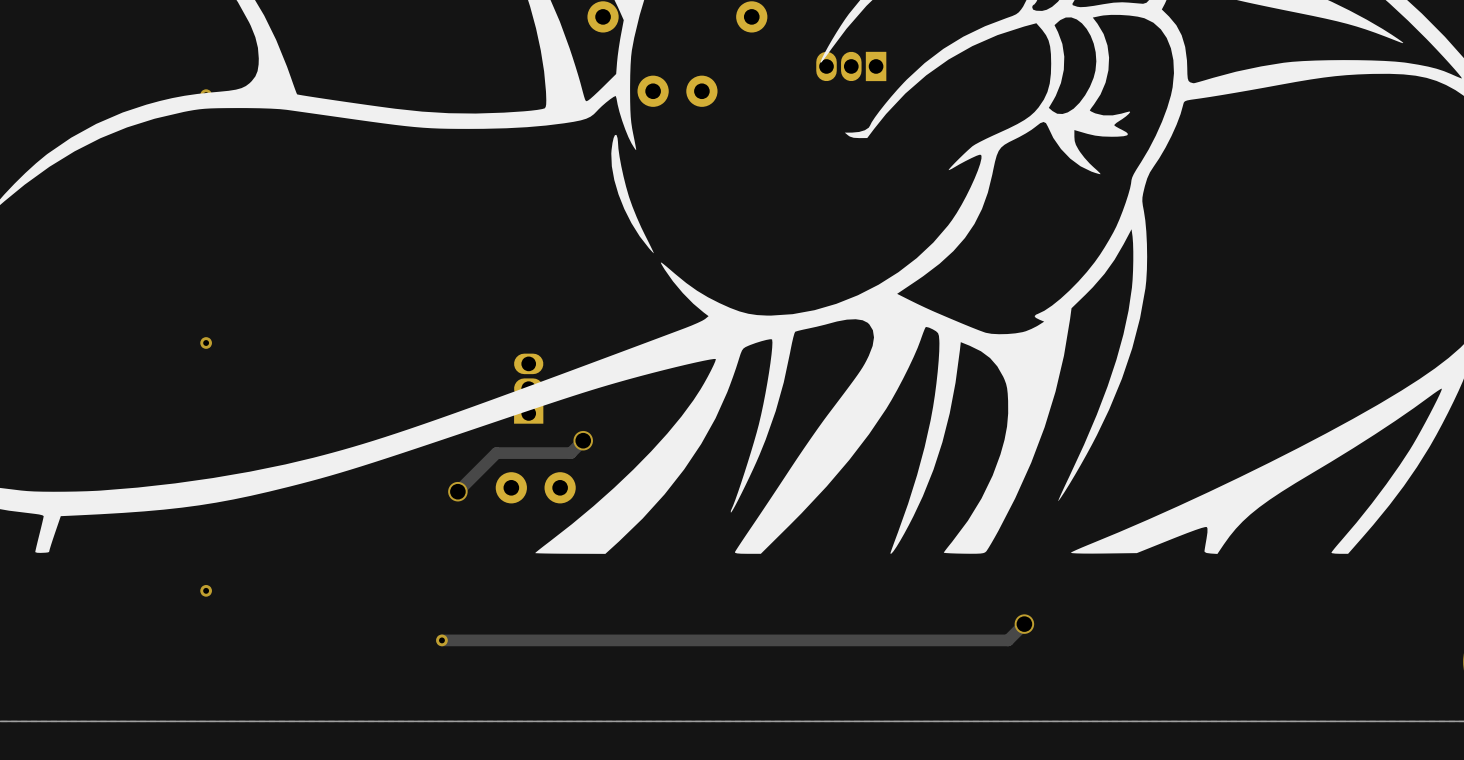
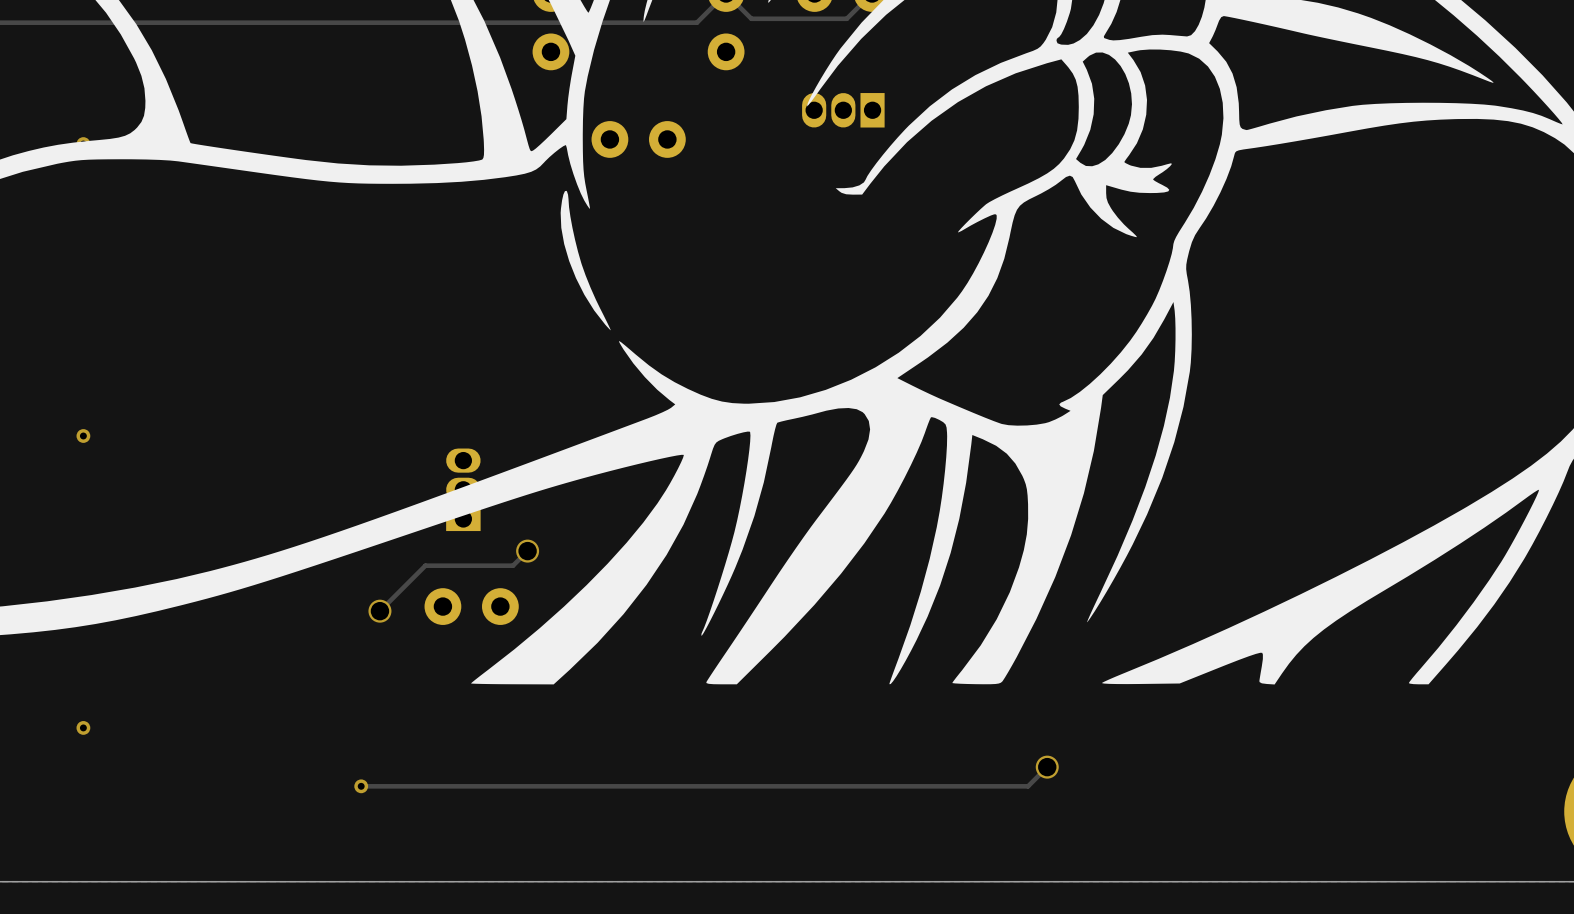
track width: thick (583, 440) (570, 453) (496, 453) (457, 491) -> thin (527, 551) (513, 565) (425, 565) (379, 611)
track width: thick (1024, 624) (1008, 640) (441, 640) -> thin (1047, 767) (1028, 786) (361, 786)

